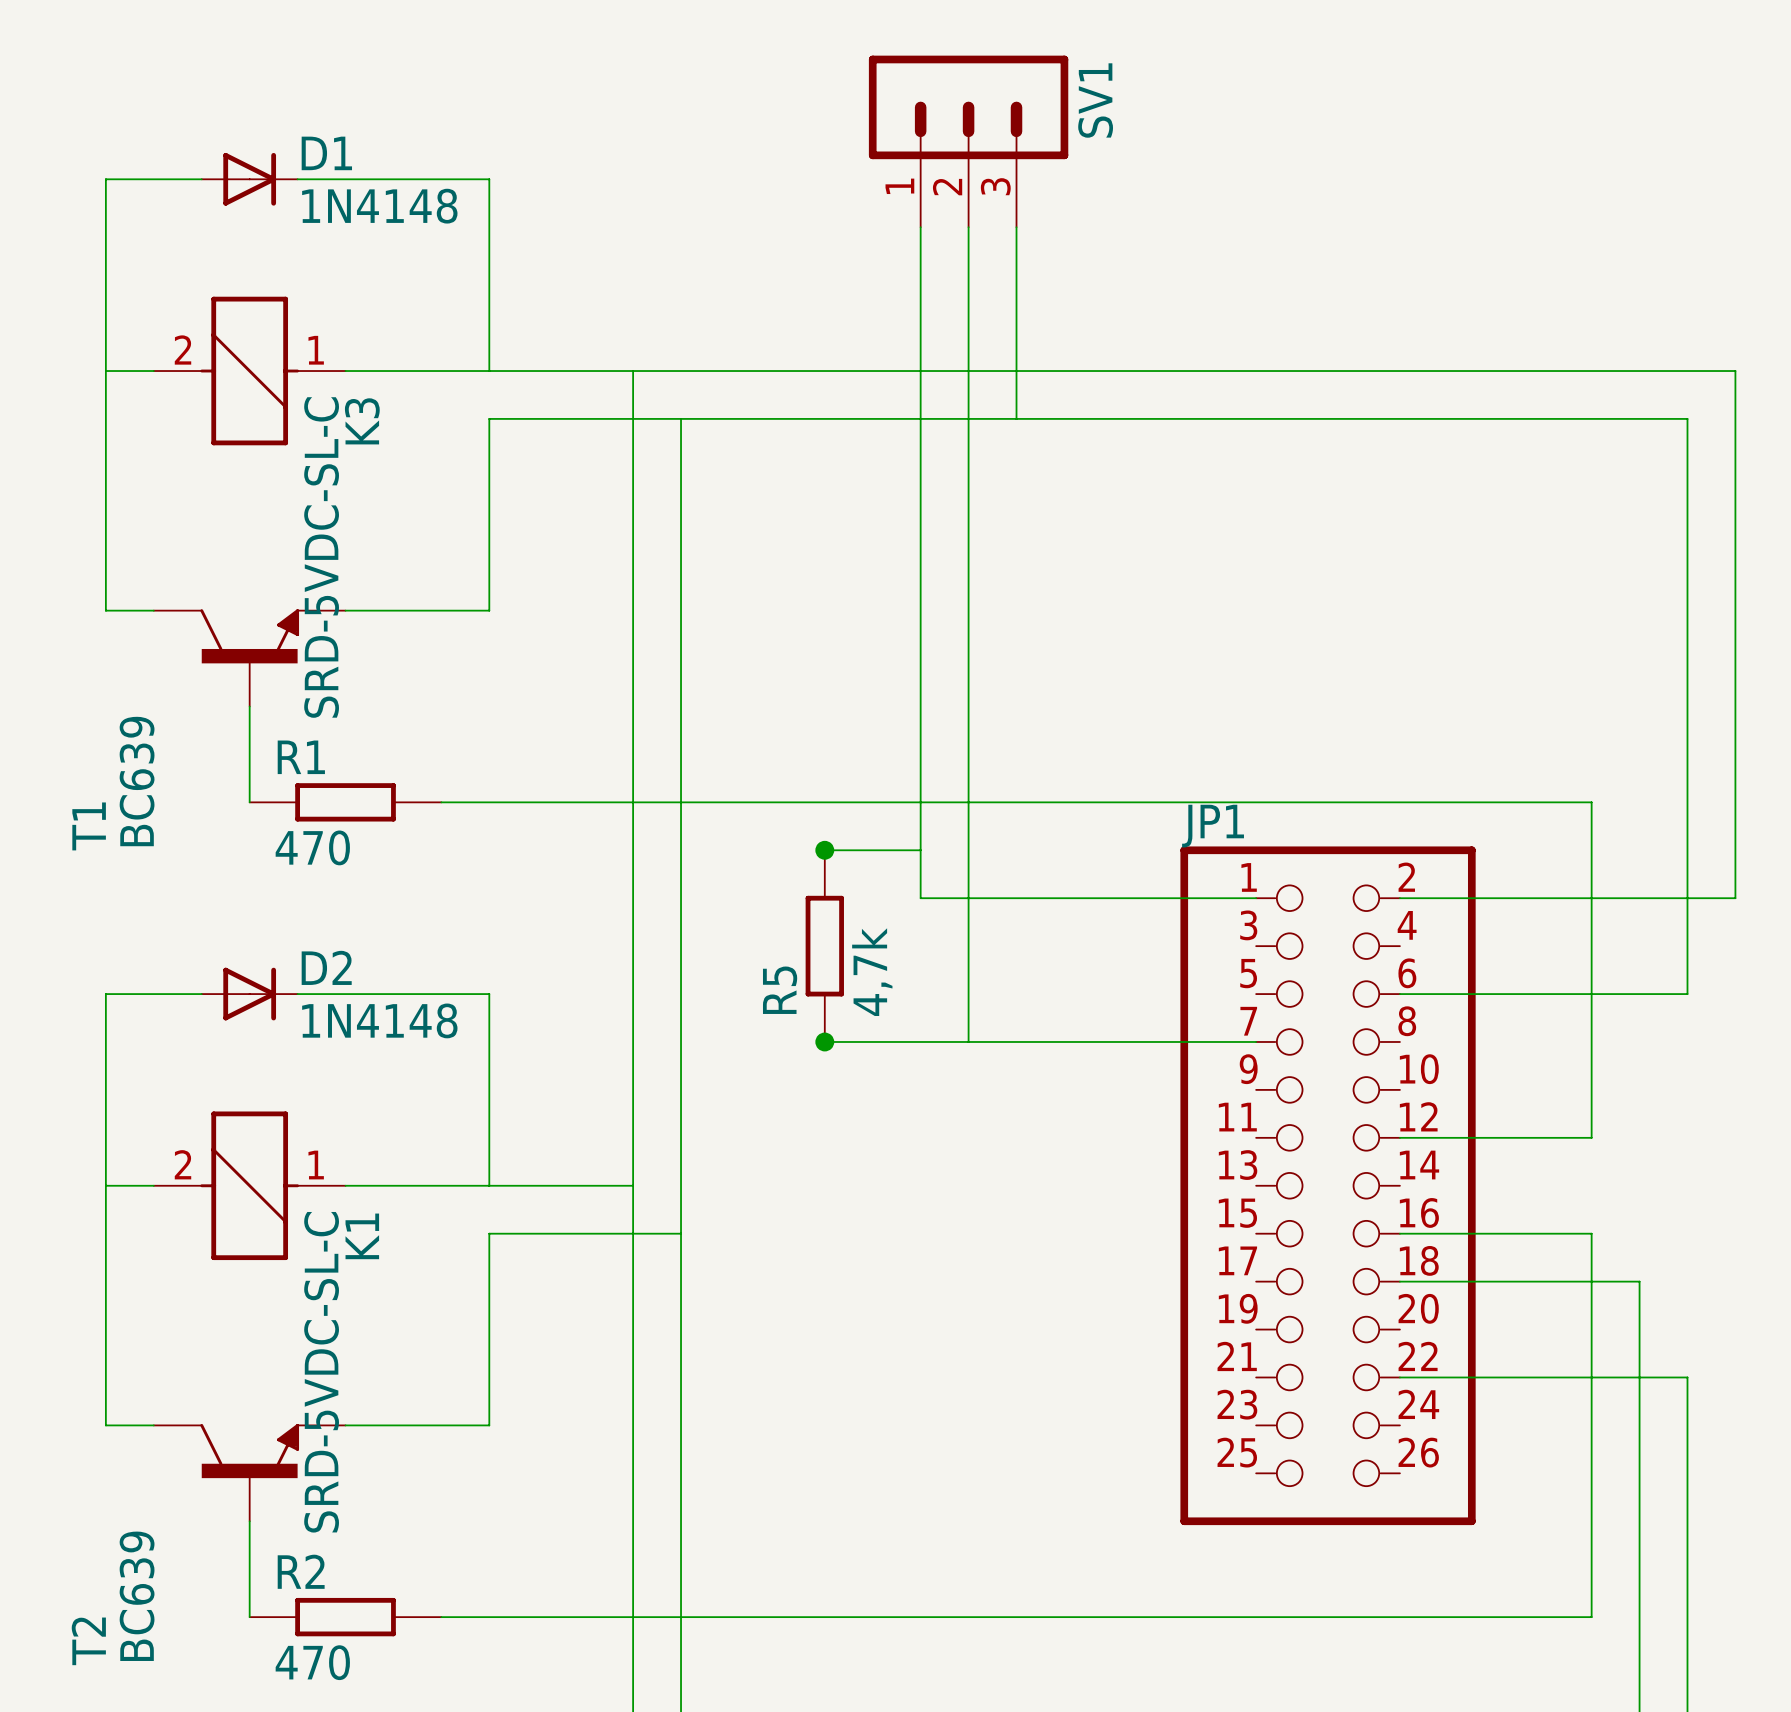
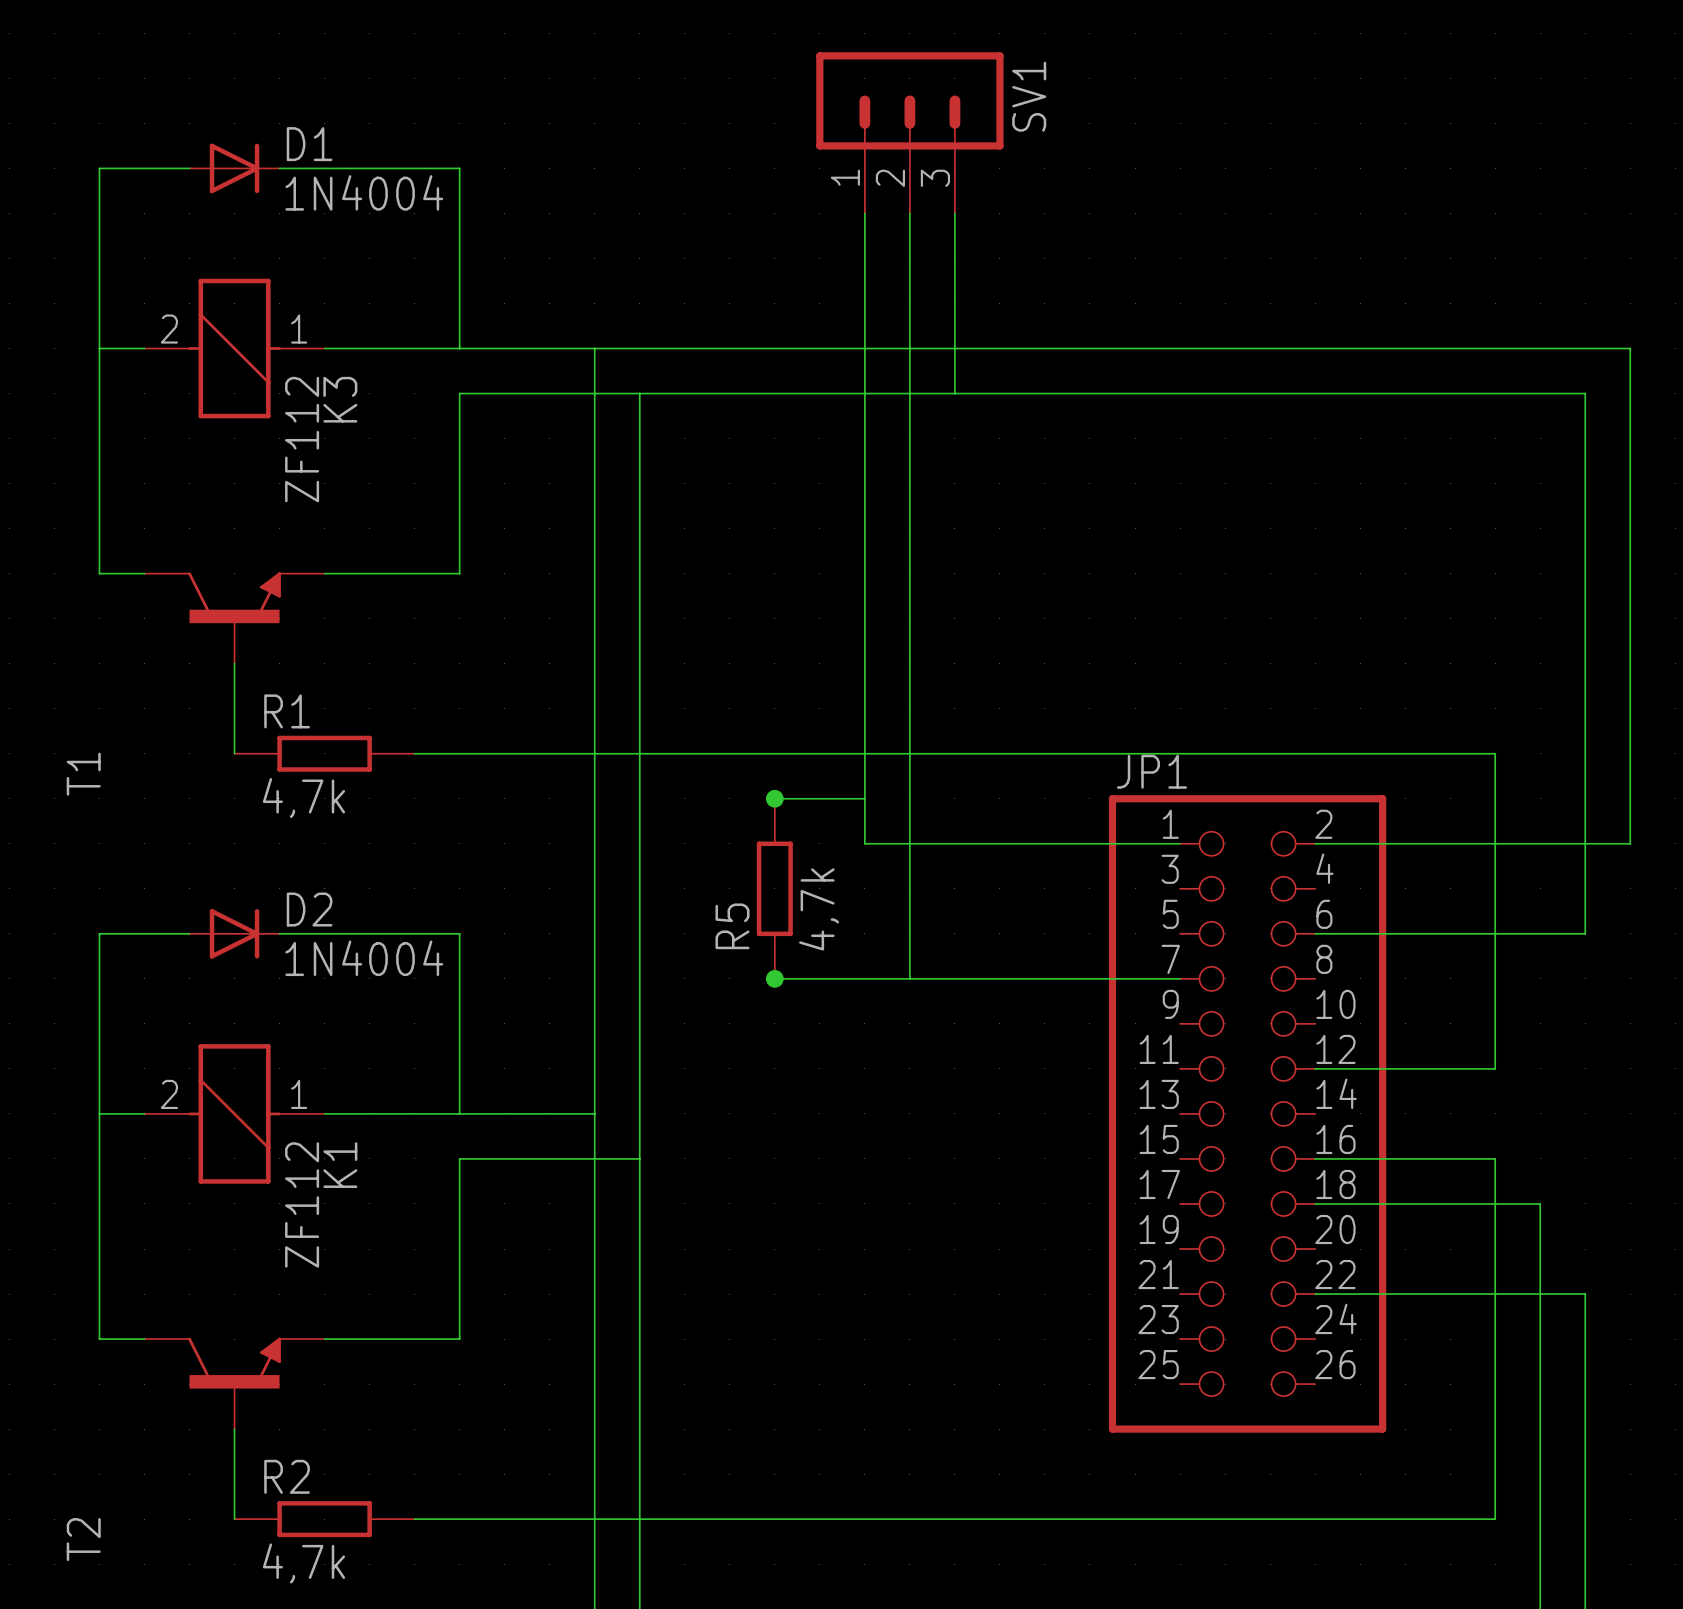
D1 value: 1N4148 (379, 206) -> 1N4004 (364, 192)
K3 value: SRD-5VDC-SL-C (321, 557) -> ZF112 (302, 439)
T1 value: BC639 (137, 781) -> none
R1 value: 470 (312, 847) -> 4,7k (303, 798)
D2 value: 1N4148 (379, 1020) -> 1N4004 (364, 958)
K1 value: SRD-5VDC-SL-C (321, 1372) -> ZF112 (302, 1204)
T2 value: BC639 (137, 1596) -> none
R2 value: 470 (312, 1662) -> 4,7k (303, 1563)

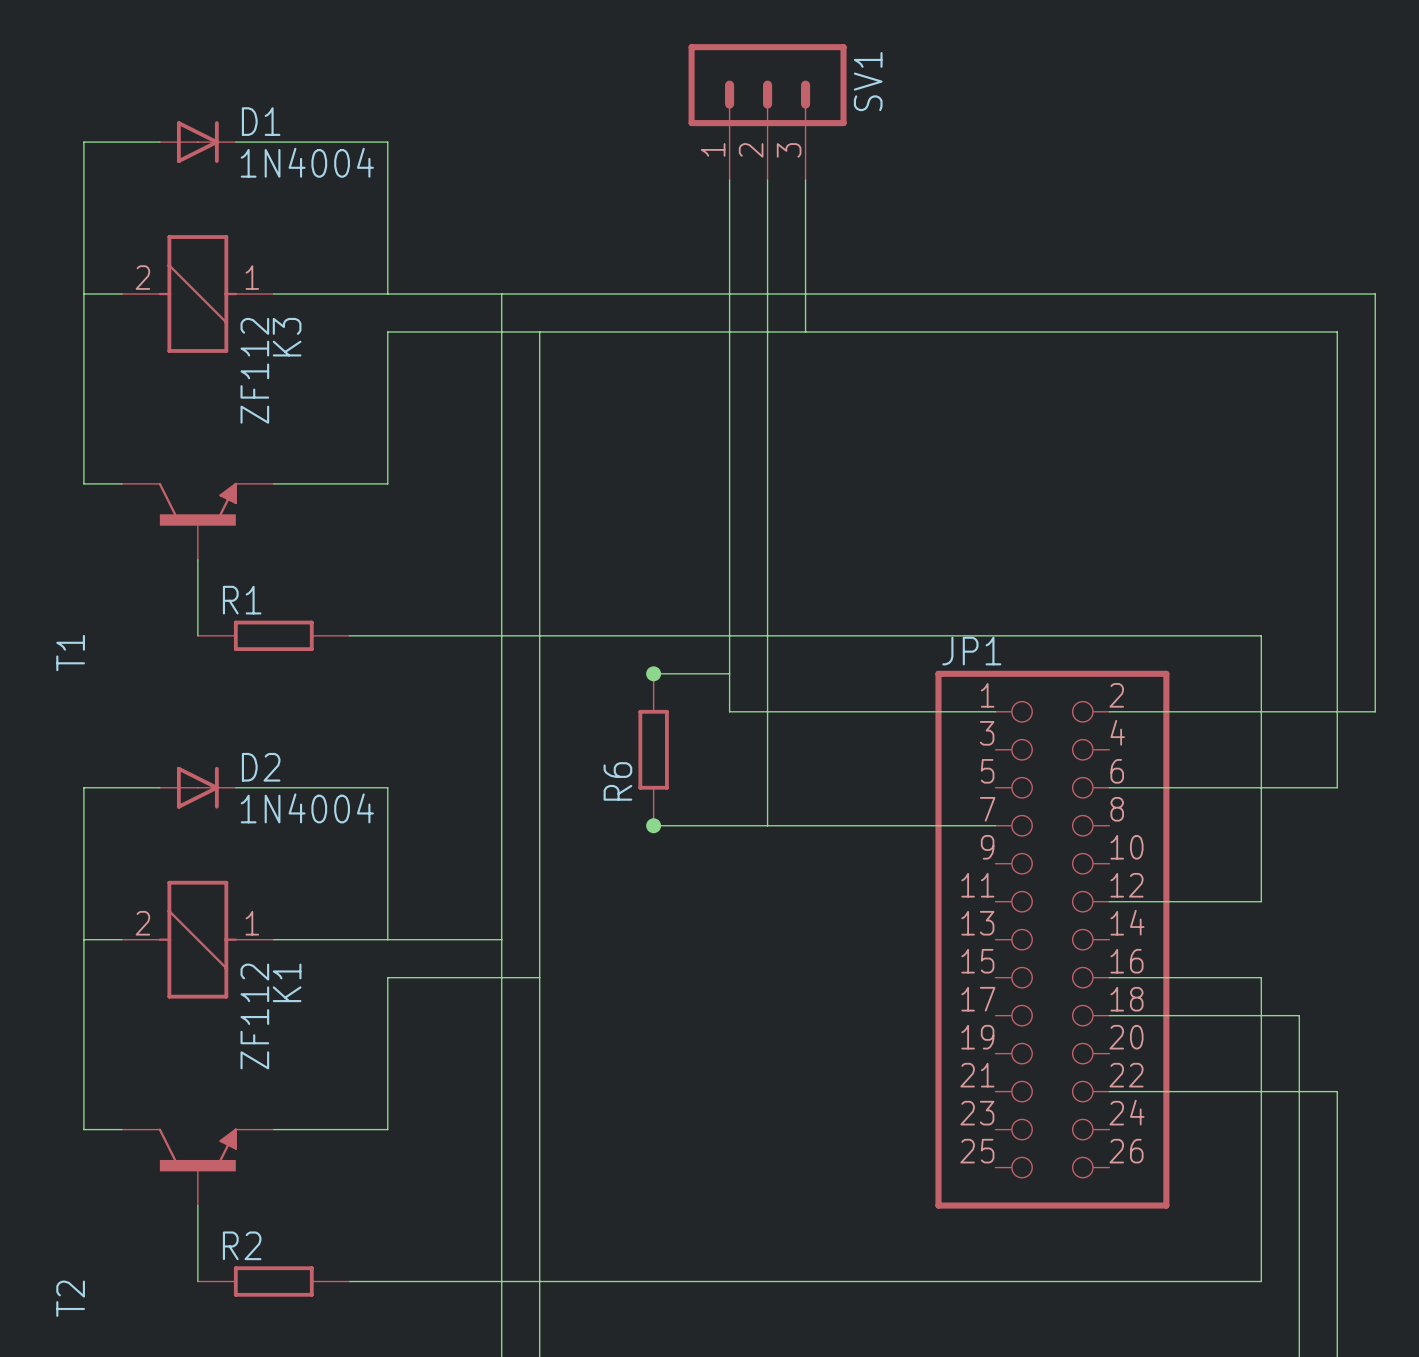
R1 value: 4,7k (303, 798) -> none
R5 value: 4,7k (819, 909) -> none
R5 name: R5 (732, 926) -> R6 (617, 781)
R2 value: 4,7k (303, 1563) -> none

